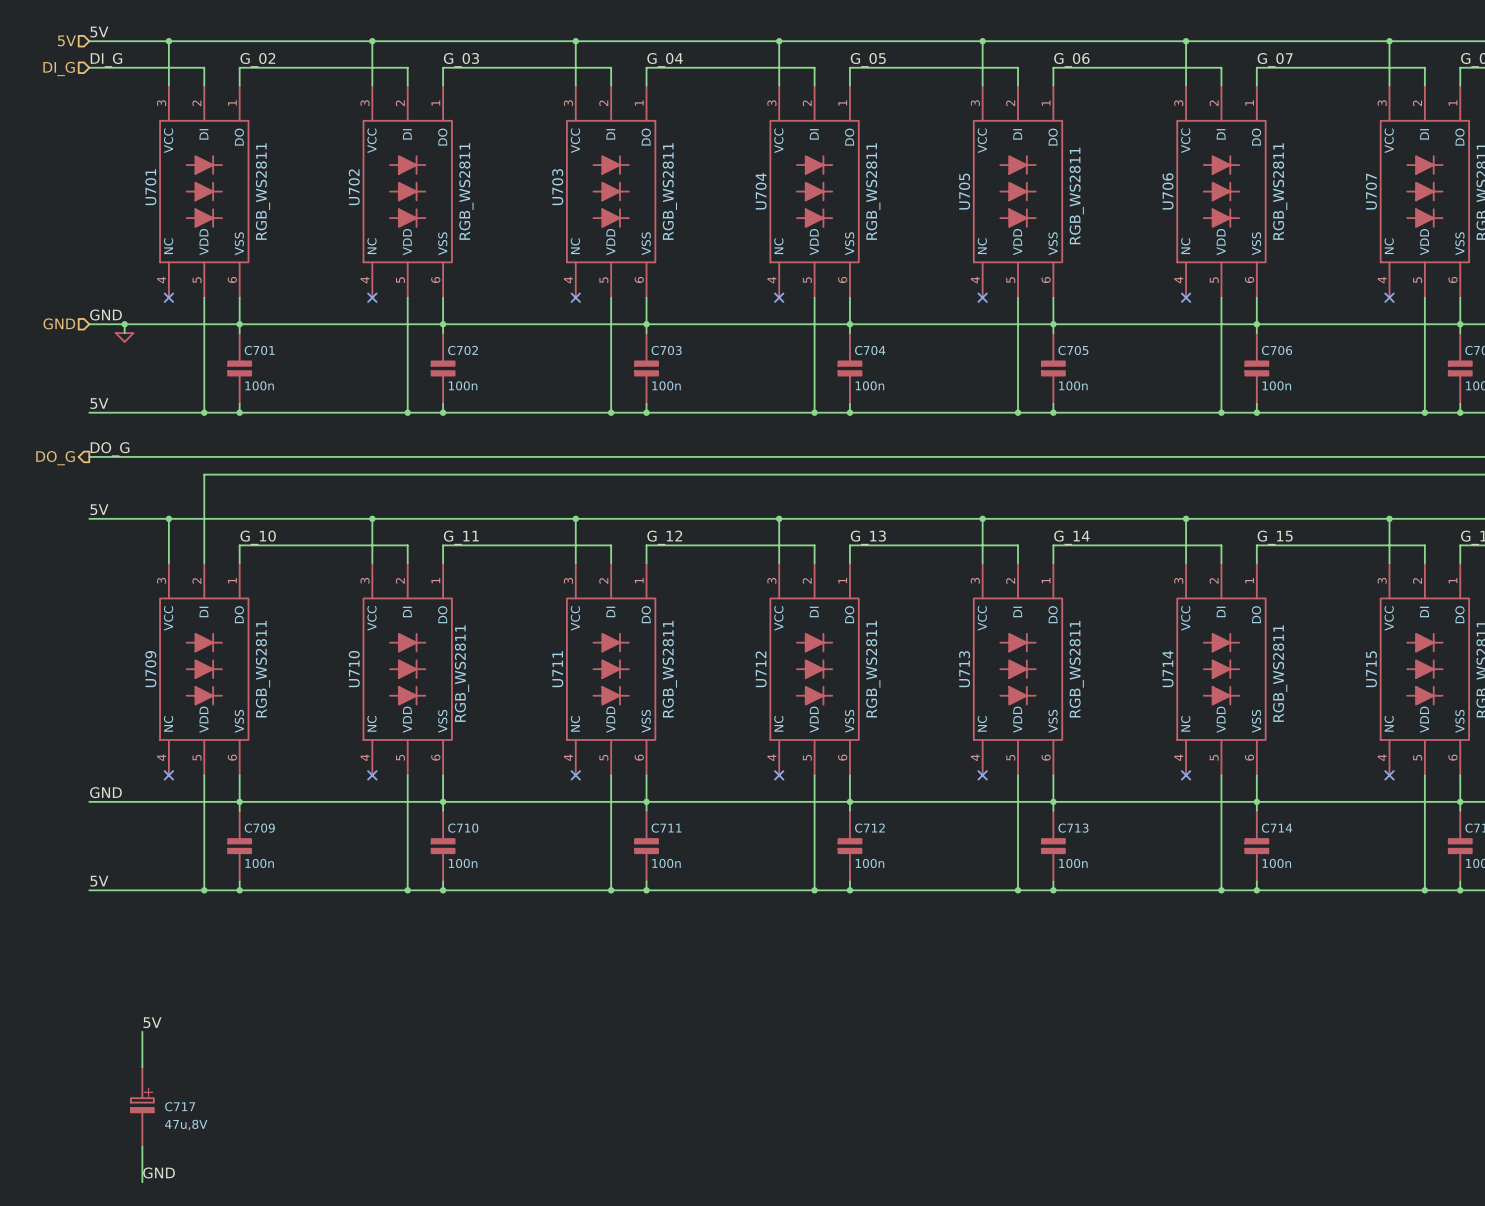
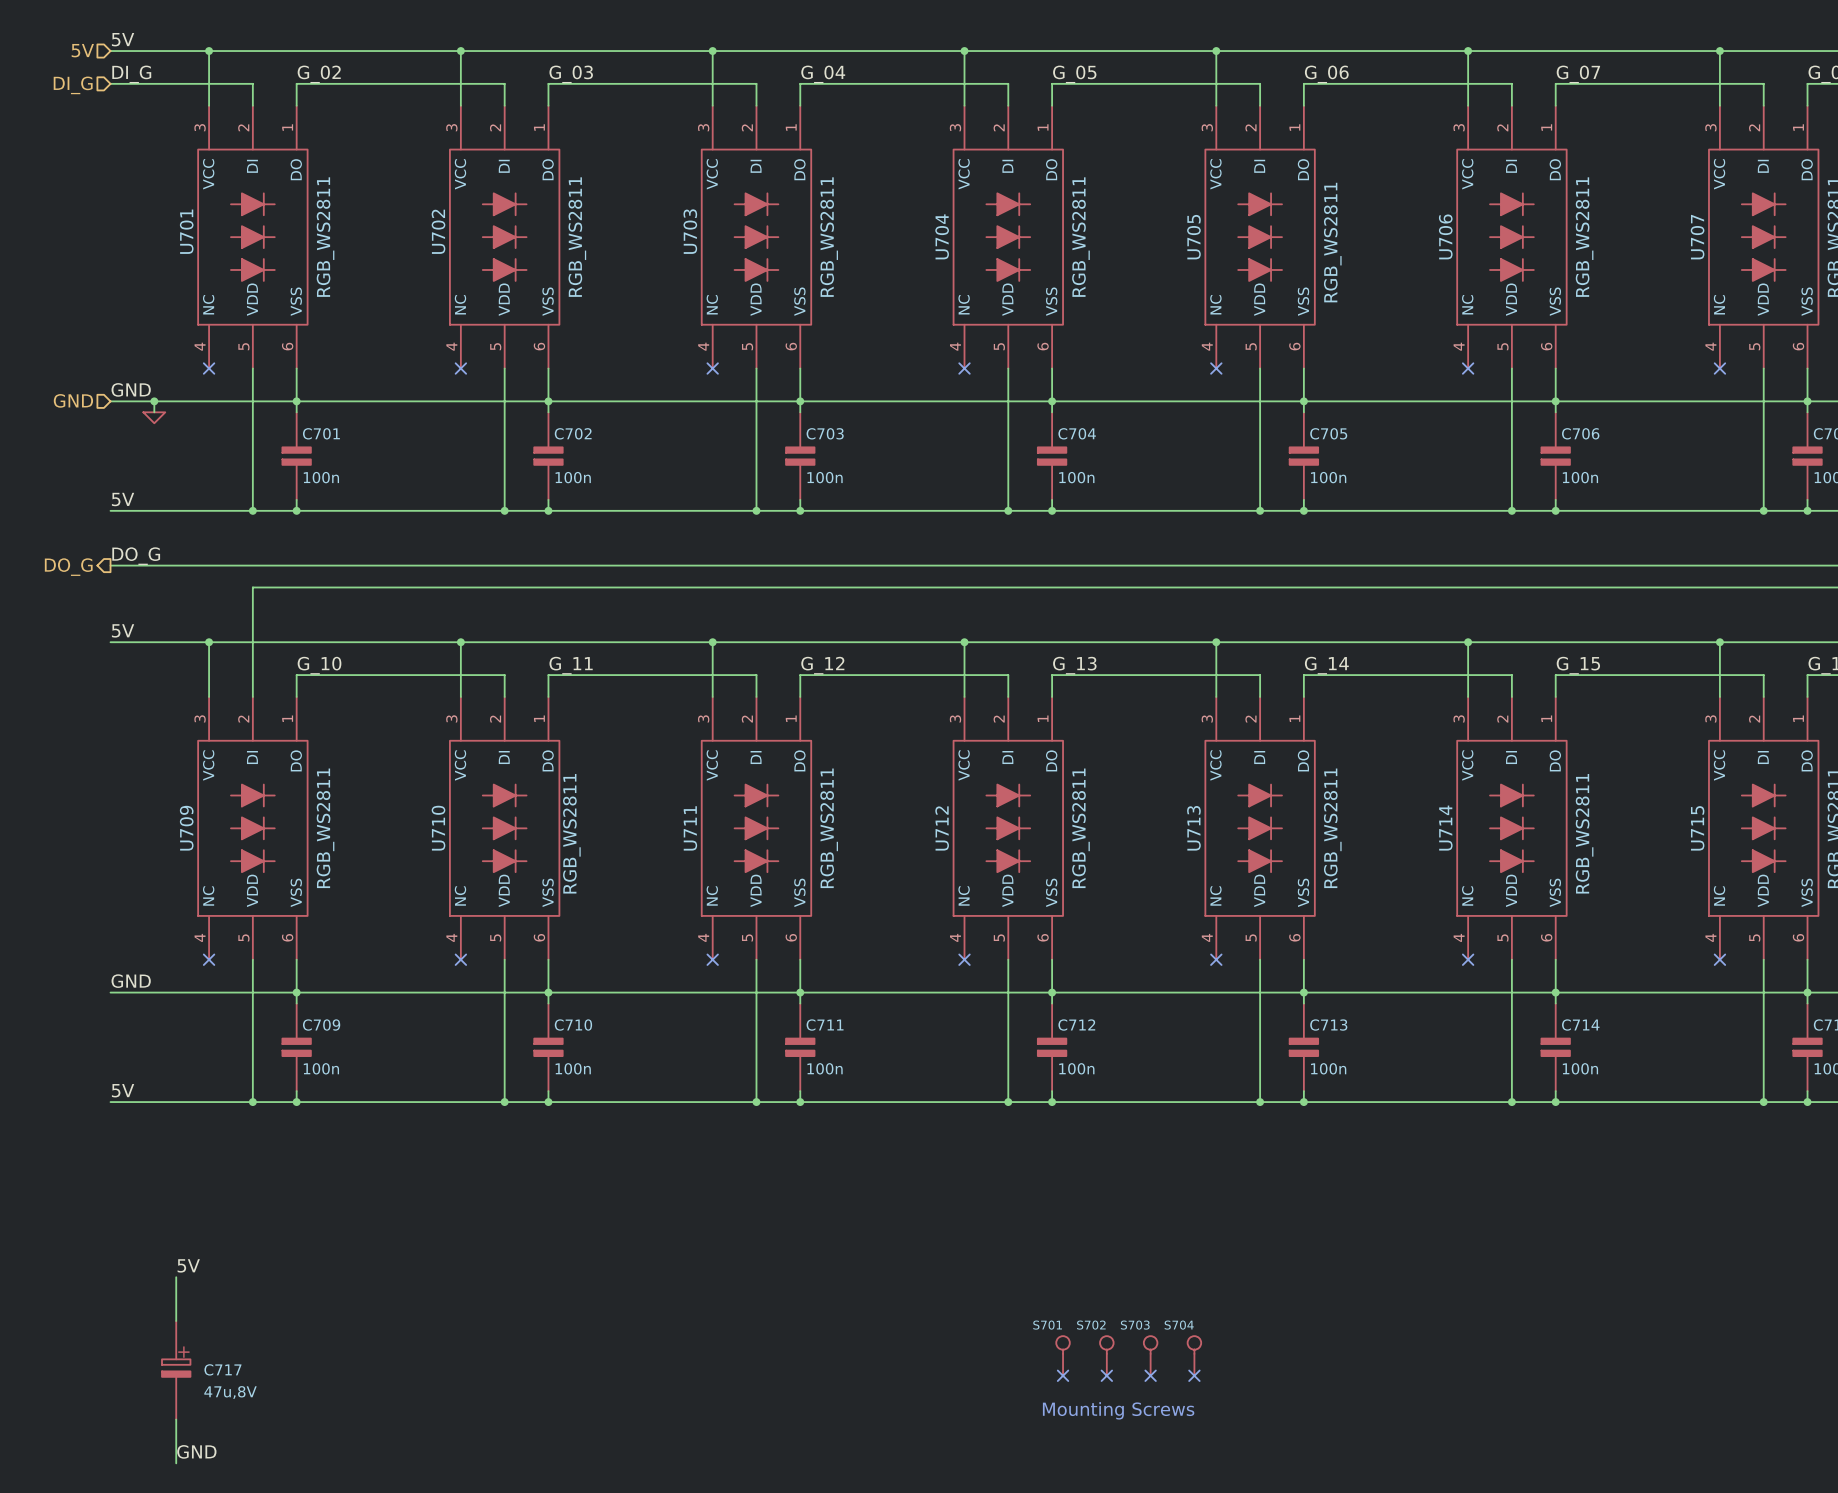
S701: none -> (1063, 1355)
S702: none -> (1106, 1355)
S703: none -> (1150, 1355)
S704: none -> (1194, 1355)
no-connect mark: none -> (1063, 1375)
no-connect mark: none -> (1106, 1375)
no-connect mark: none -> (1150, 1375)
no-connect mark: none -> (1194, 1375)
text: none -> Mounting Screws (1118, 1410)

